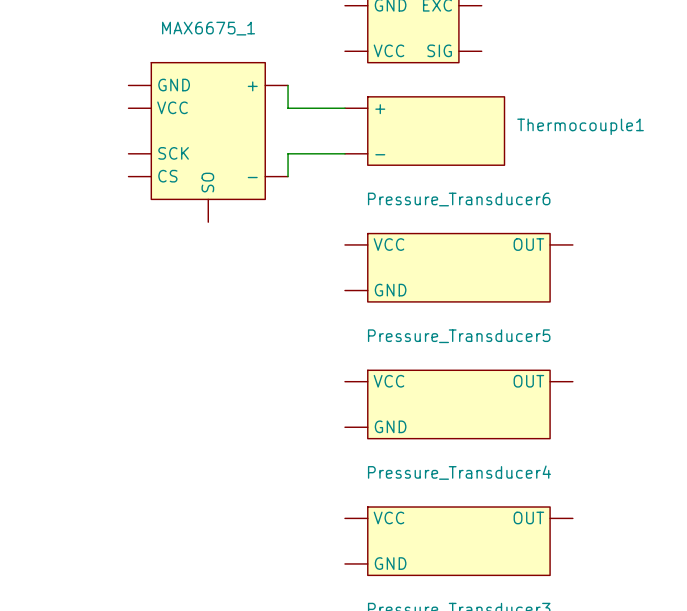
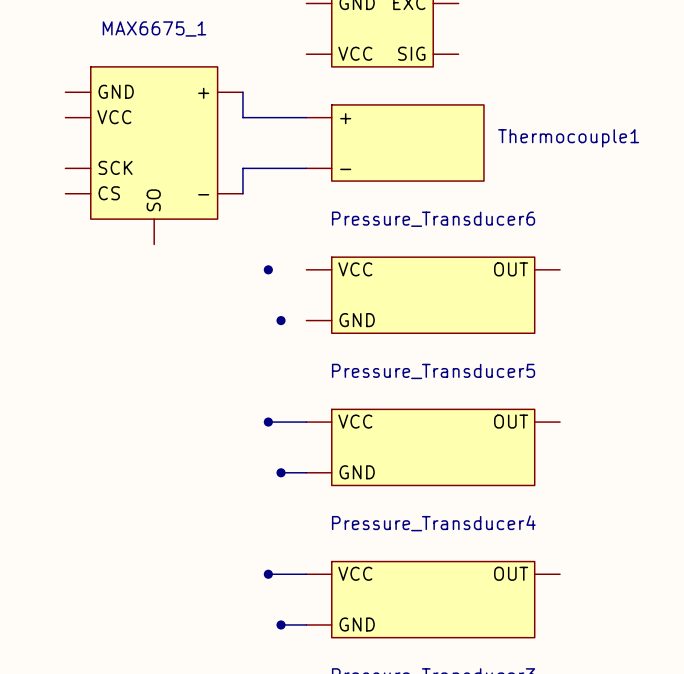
junction: none -> (268, 269)
junction: none -> (281, 320)
wire: none -> (268, 422) (306, 422)
junction: none -> (268, 422)
wire: none -> (281, 472) (306, 472)
junction: none -> (281, 472)
wire: none -> (268, 574) (306, 574)
junction: none -> (268, 574)
wire: none -> (281, 624) (306, 624)
junction: none -> (281, 624)

